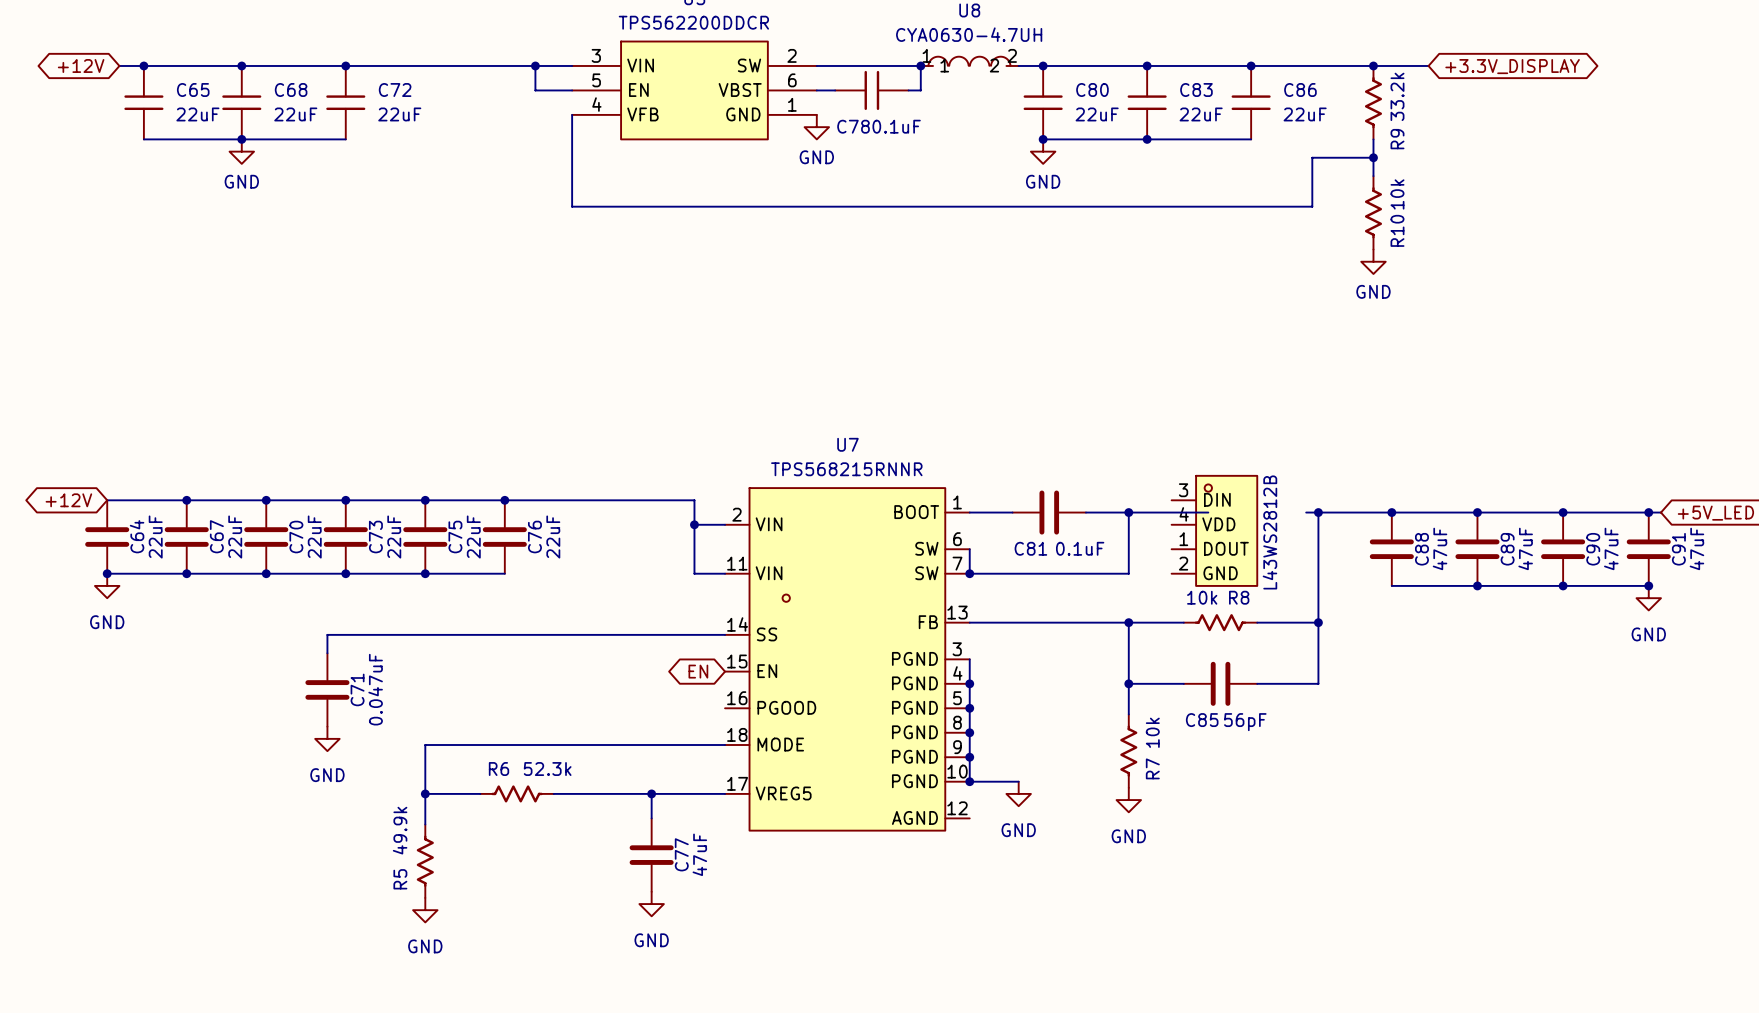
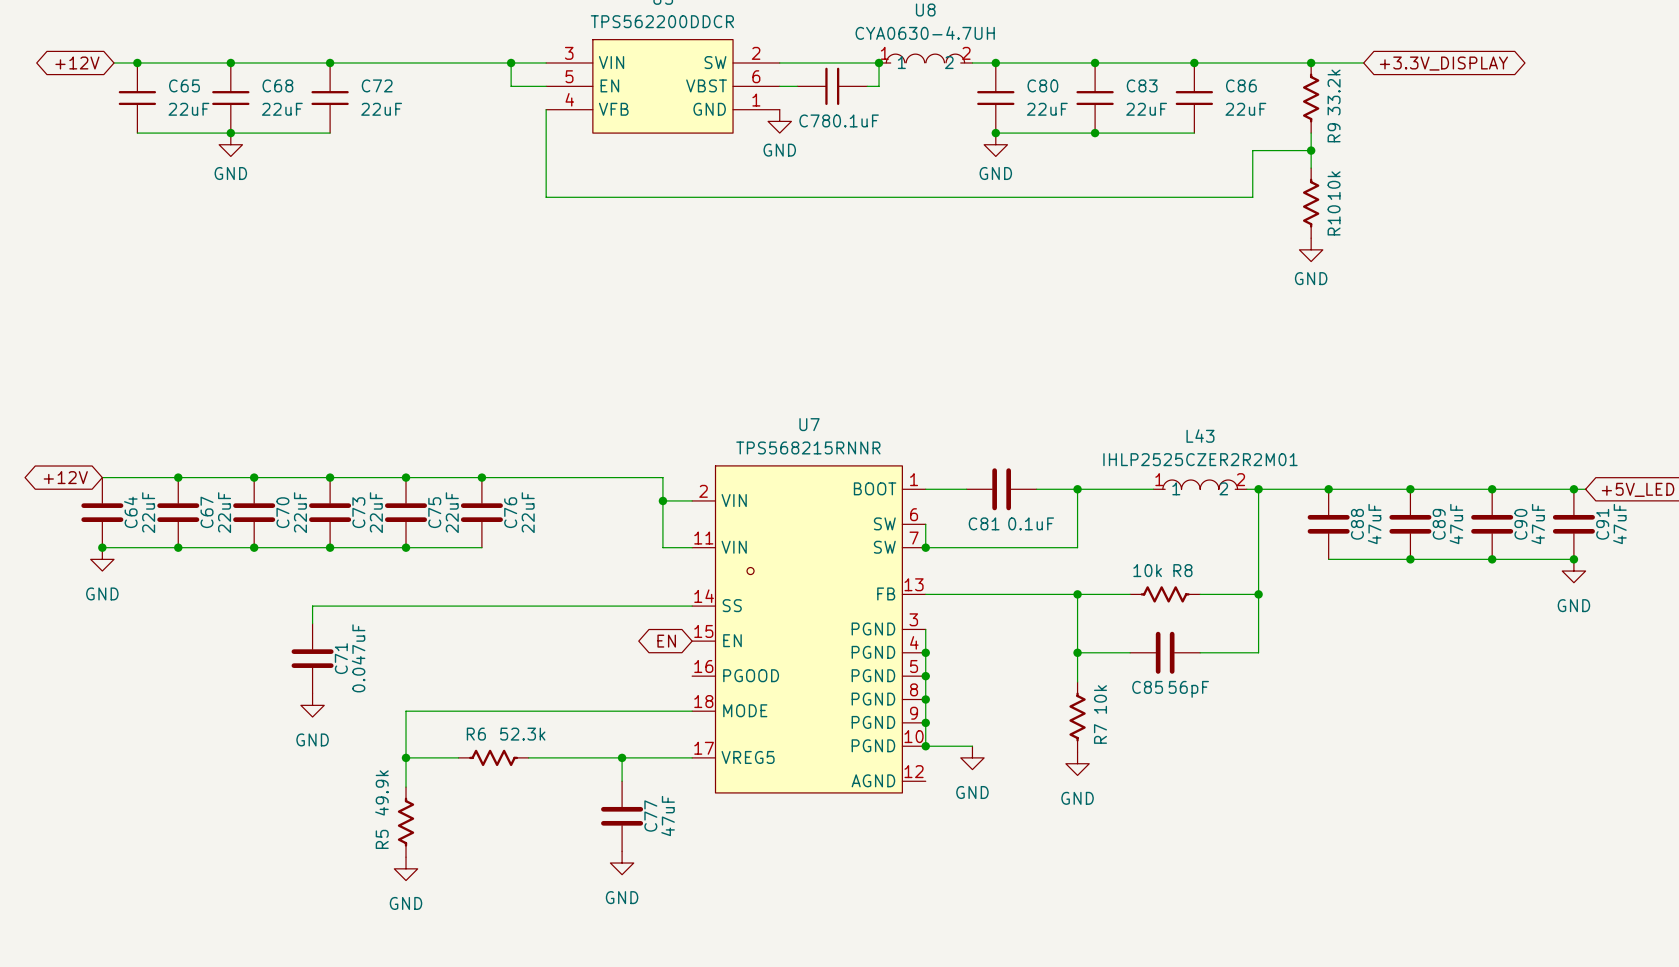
L43 symbol: [1171, 475, 1258, 586] -> [1153, 479, 1247, 490]
L43 value: WS2812B (1270, 516) -> IHLP2525CZER2R2M01 (1200, 459)
L43 name position: L43 (1269, 574) -> L43 (1200, 436)

